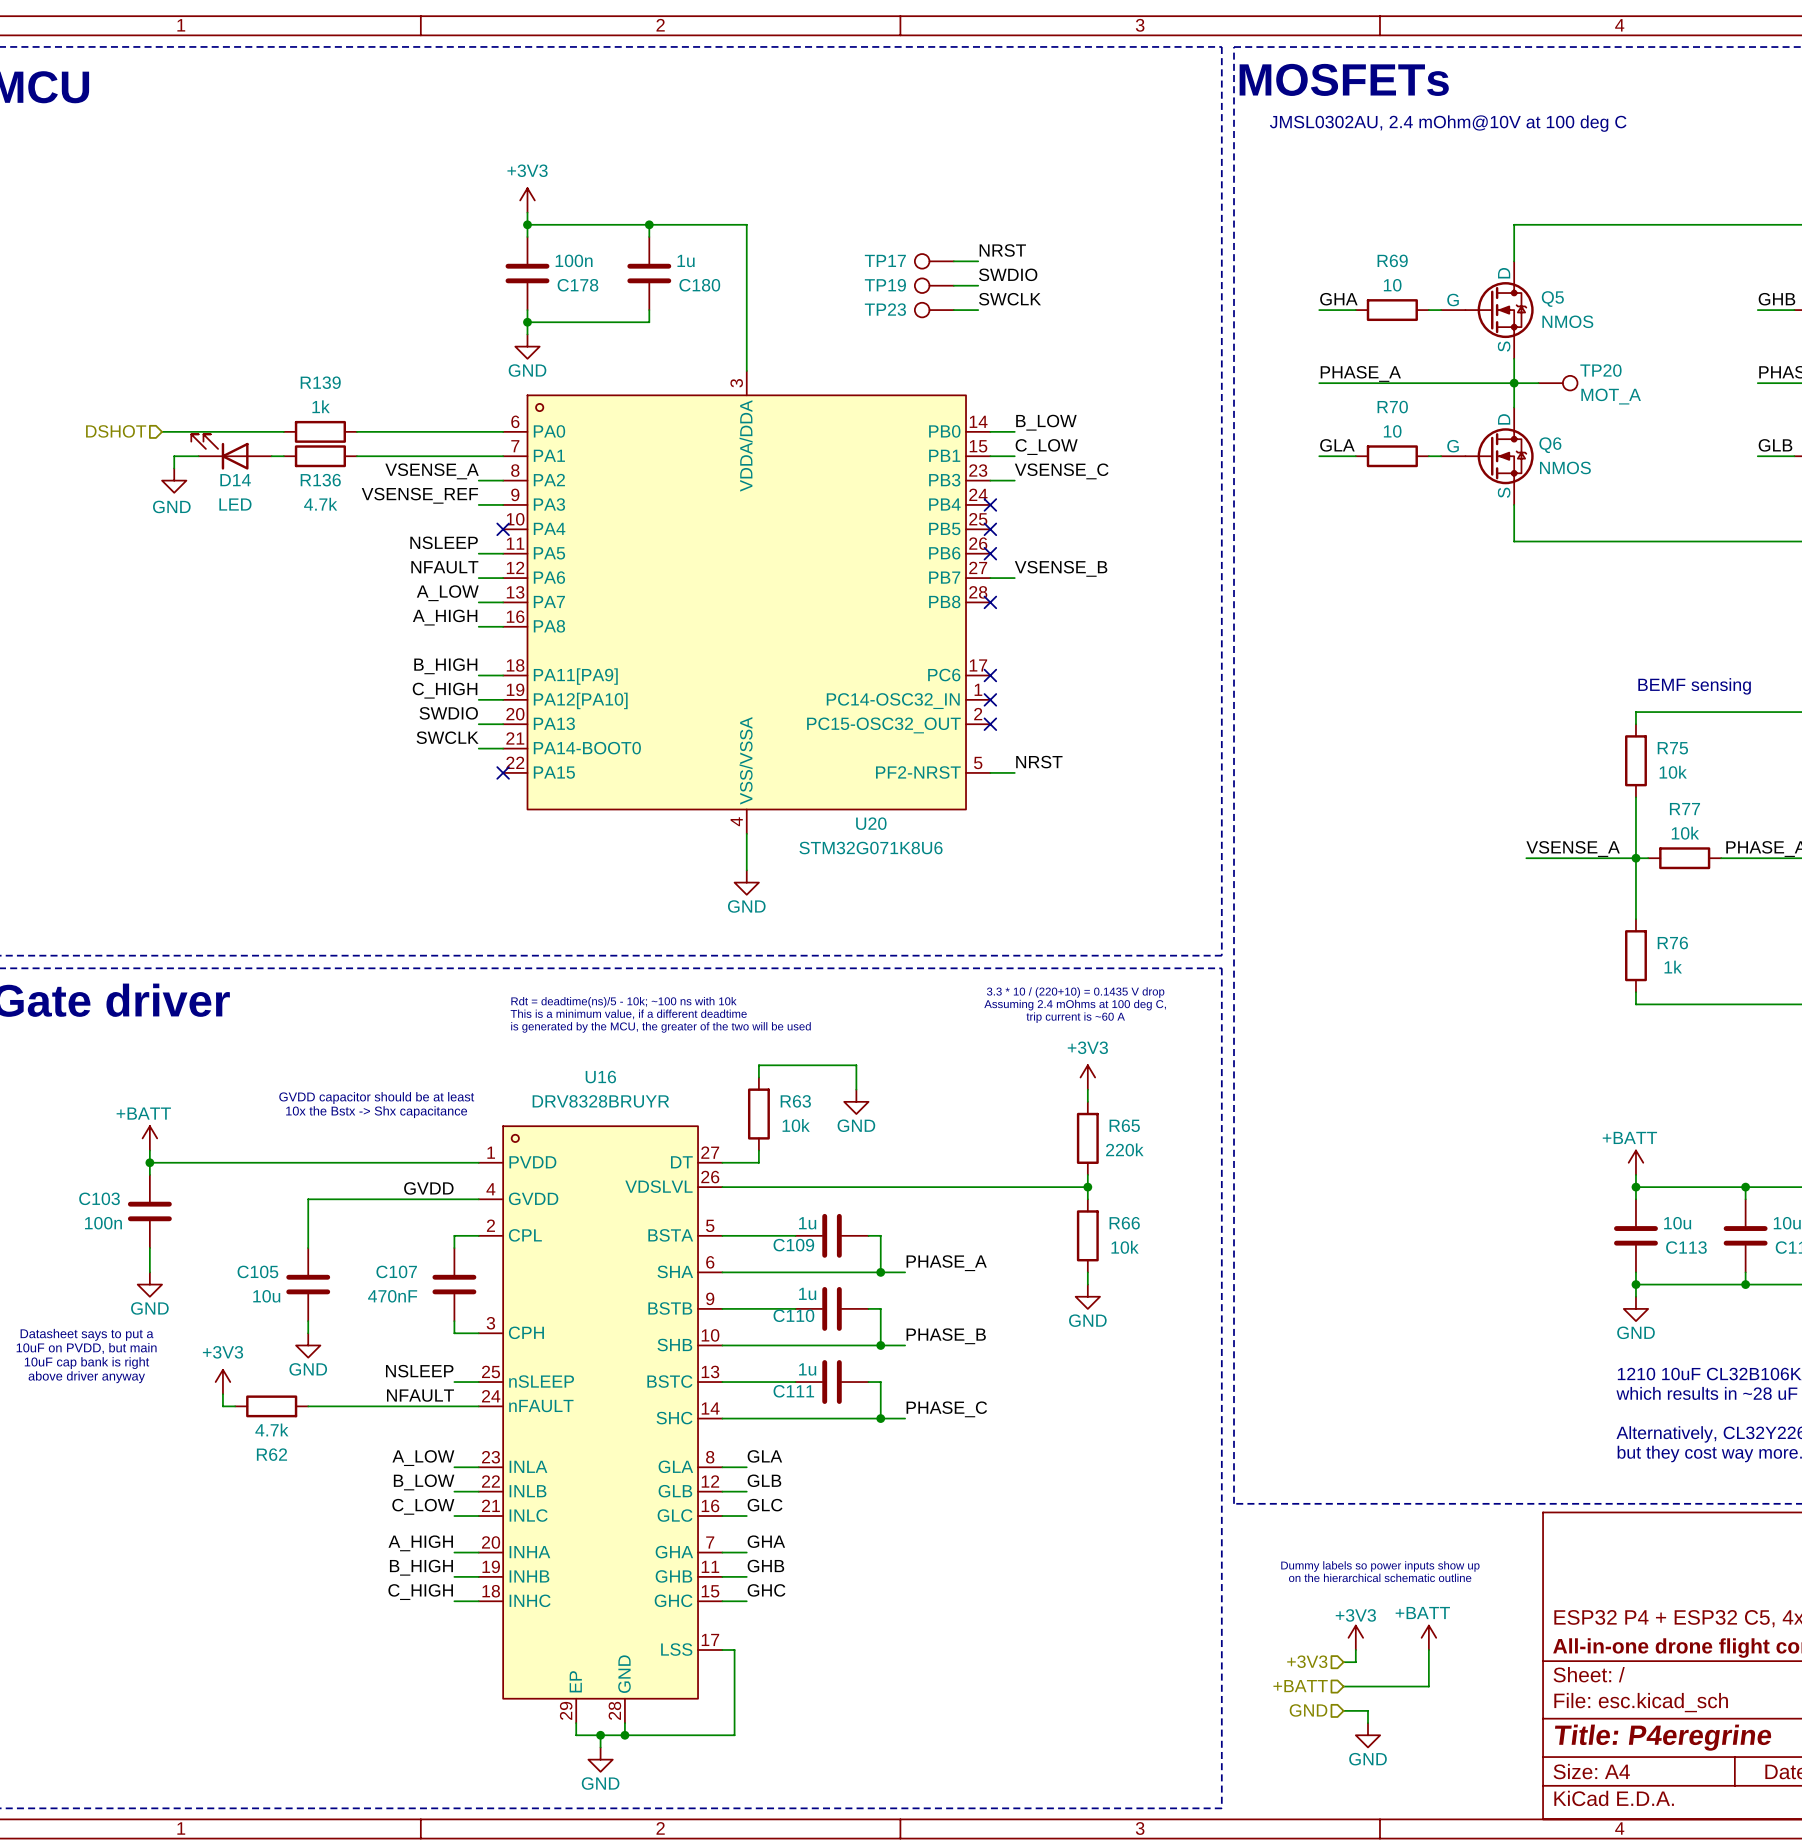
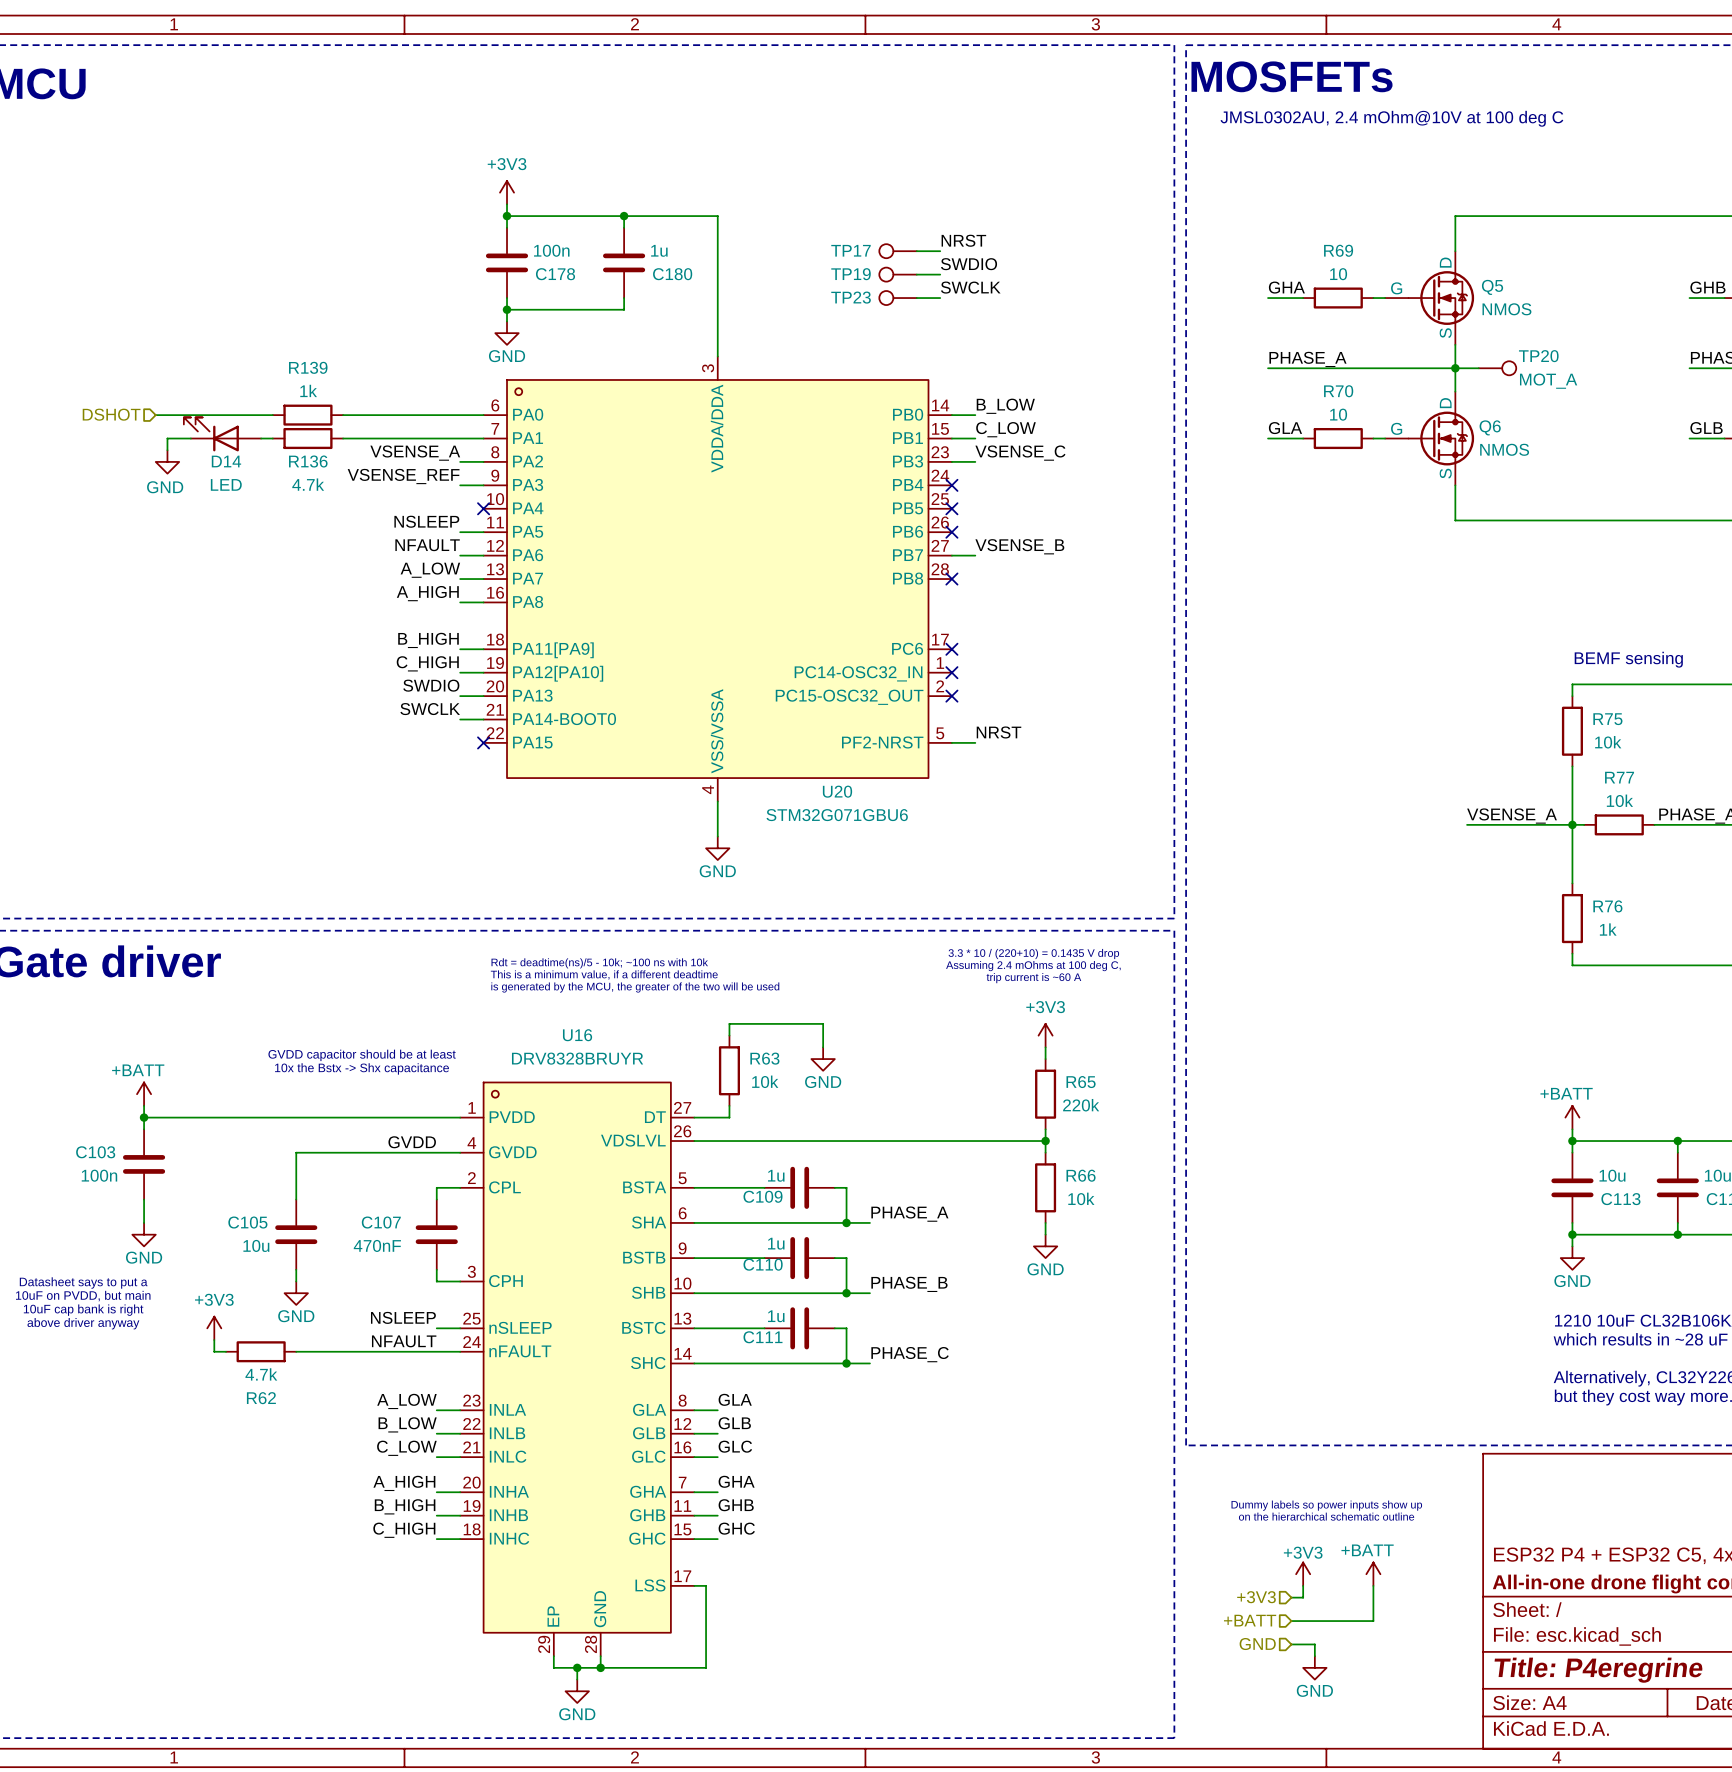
U20 value: STM32G071K8U6 (871, 848) -> STM32G071GBU6 (837, 815)

